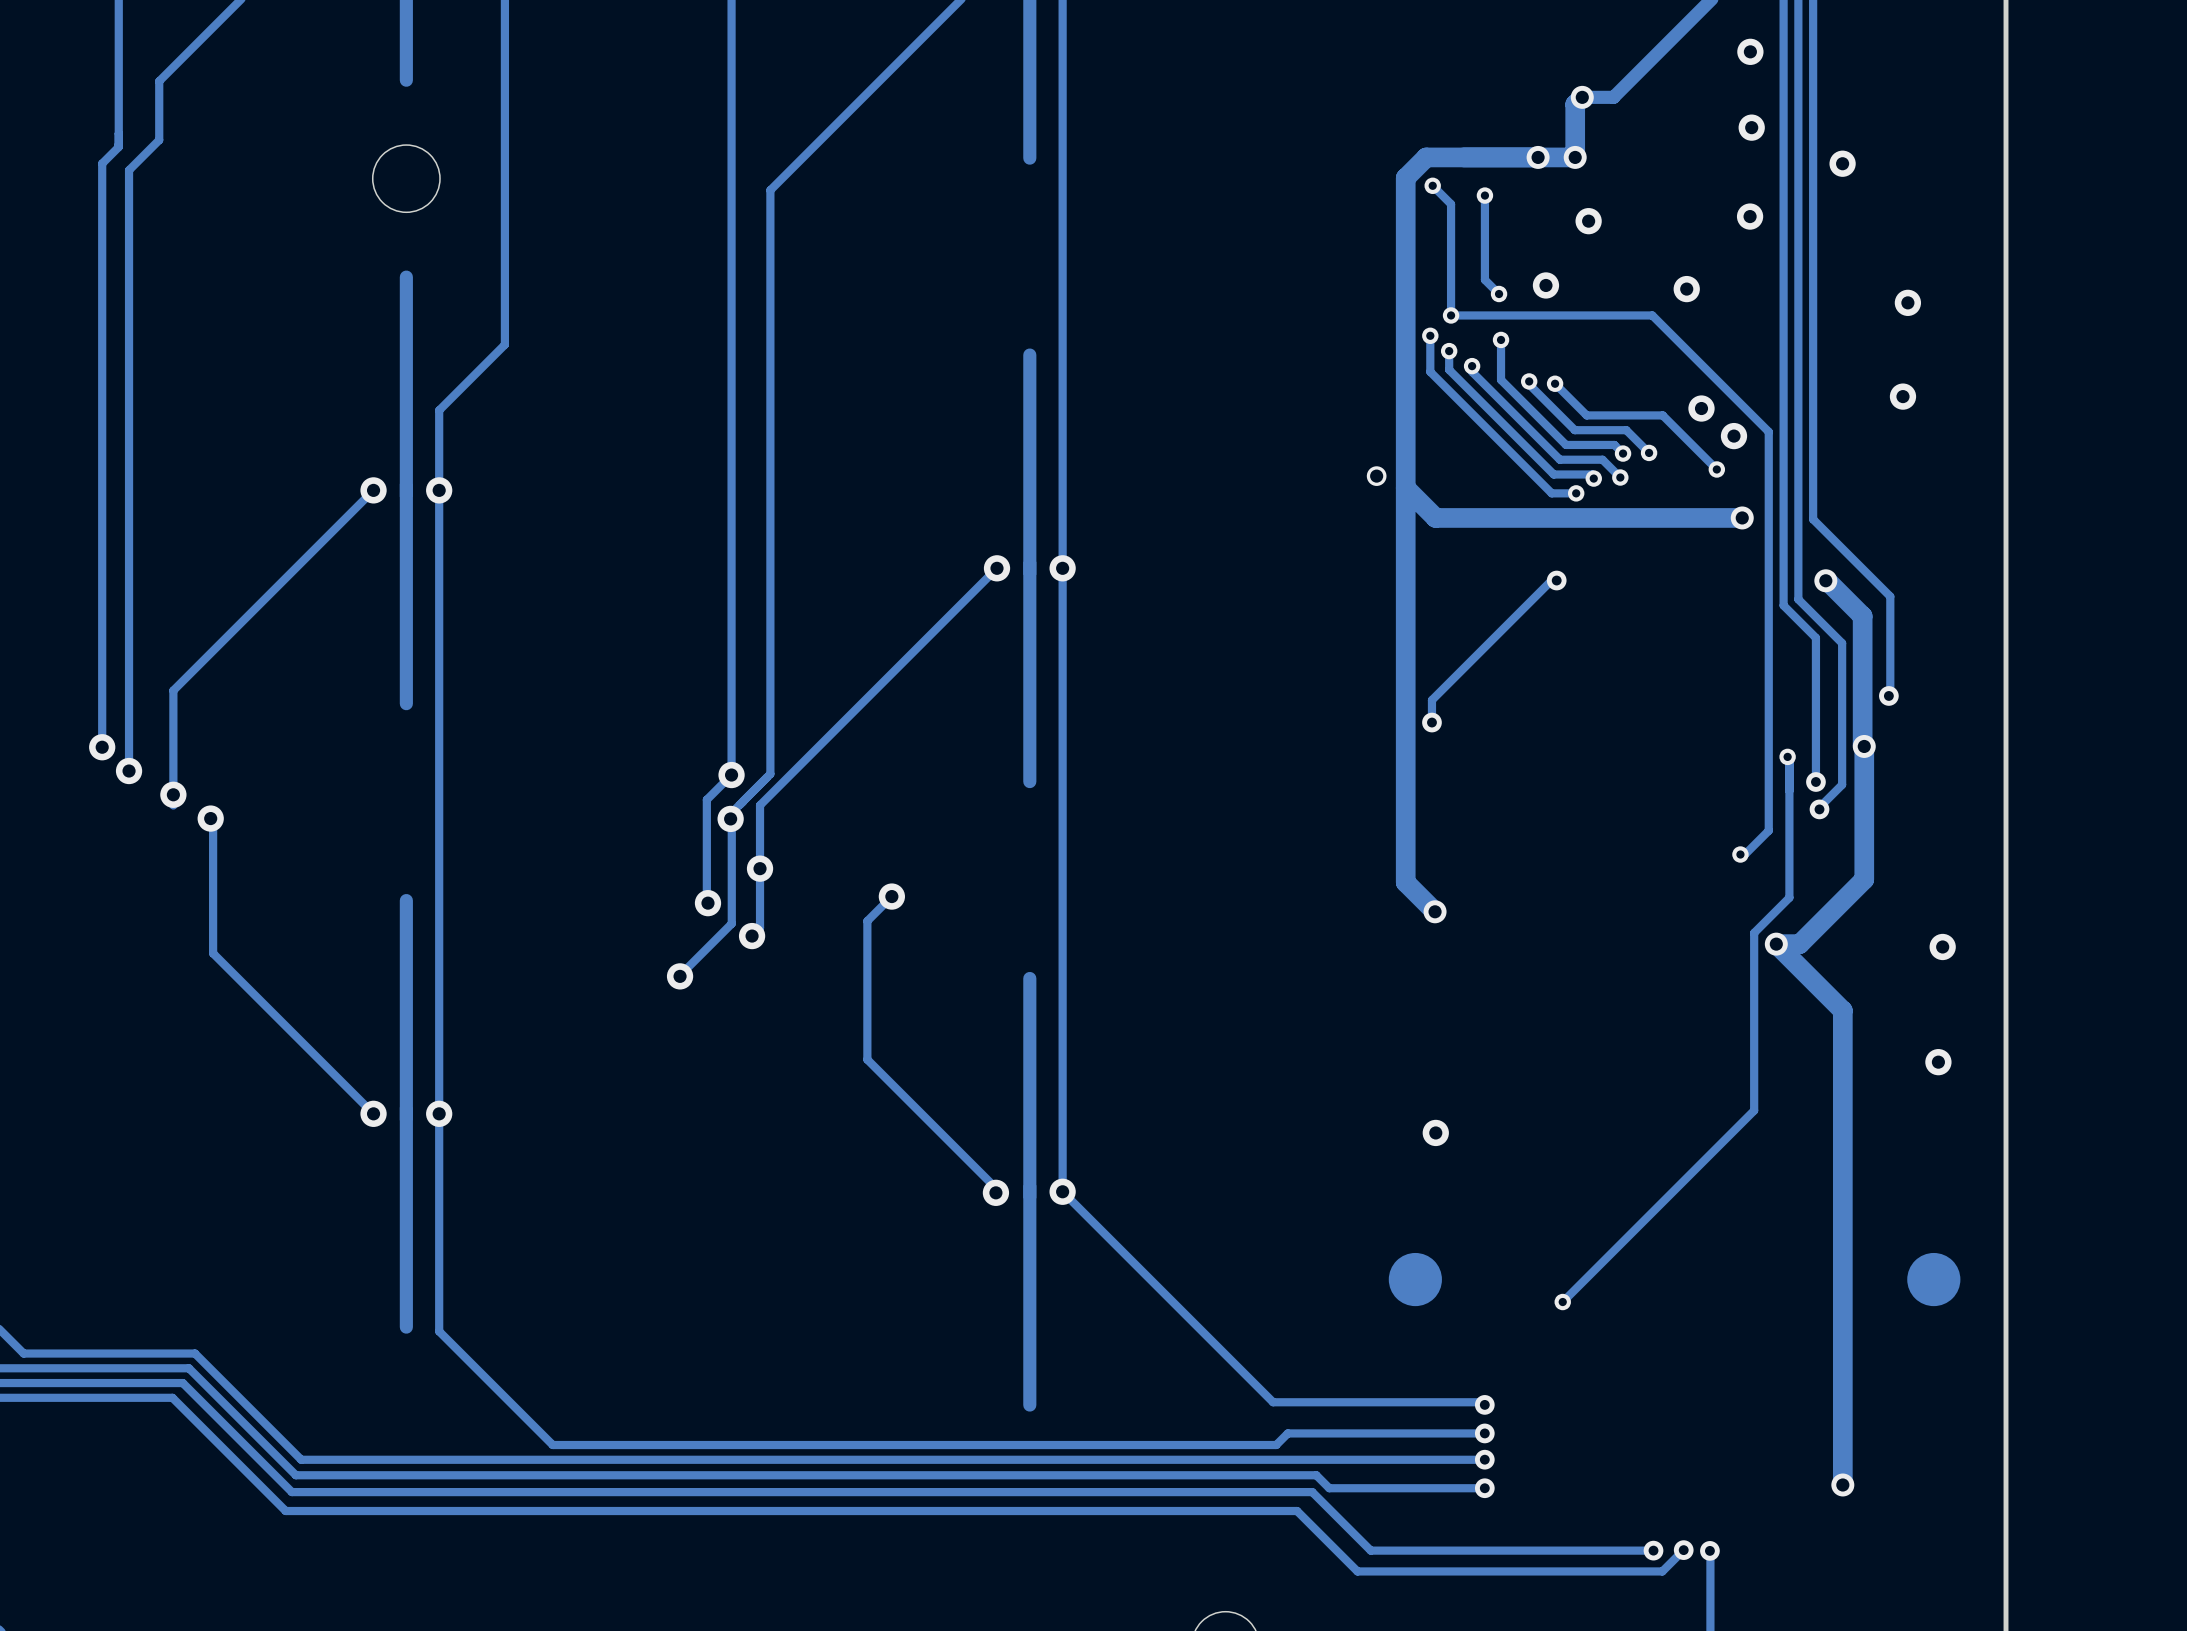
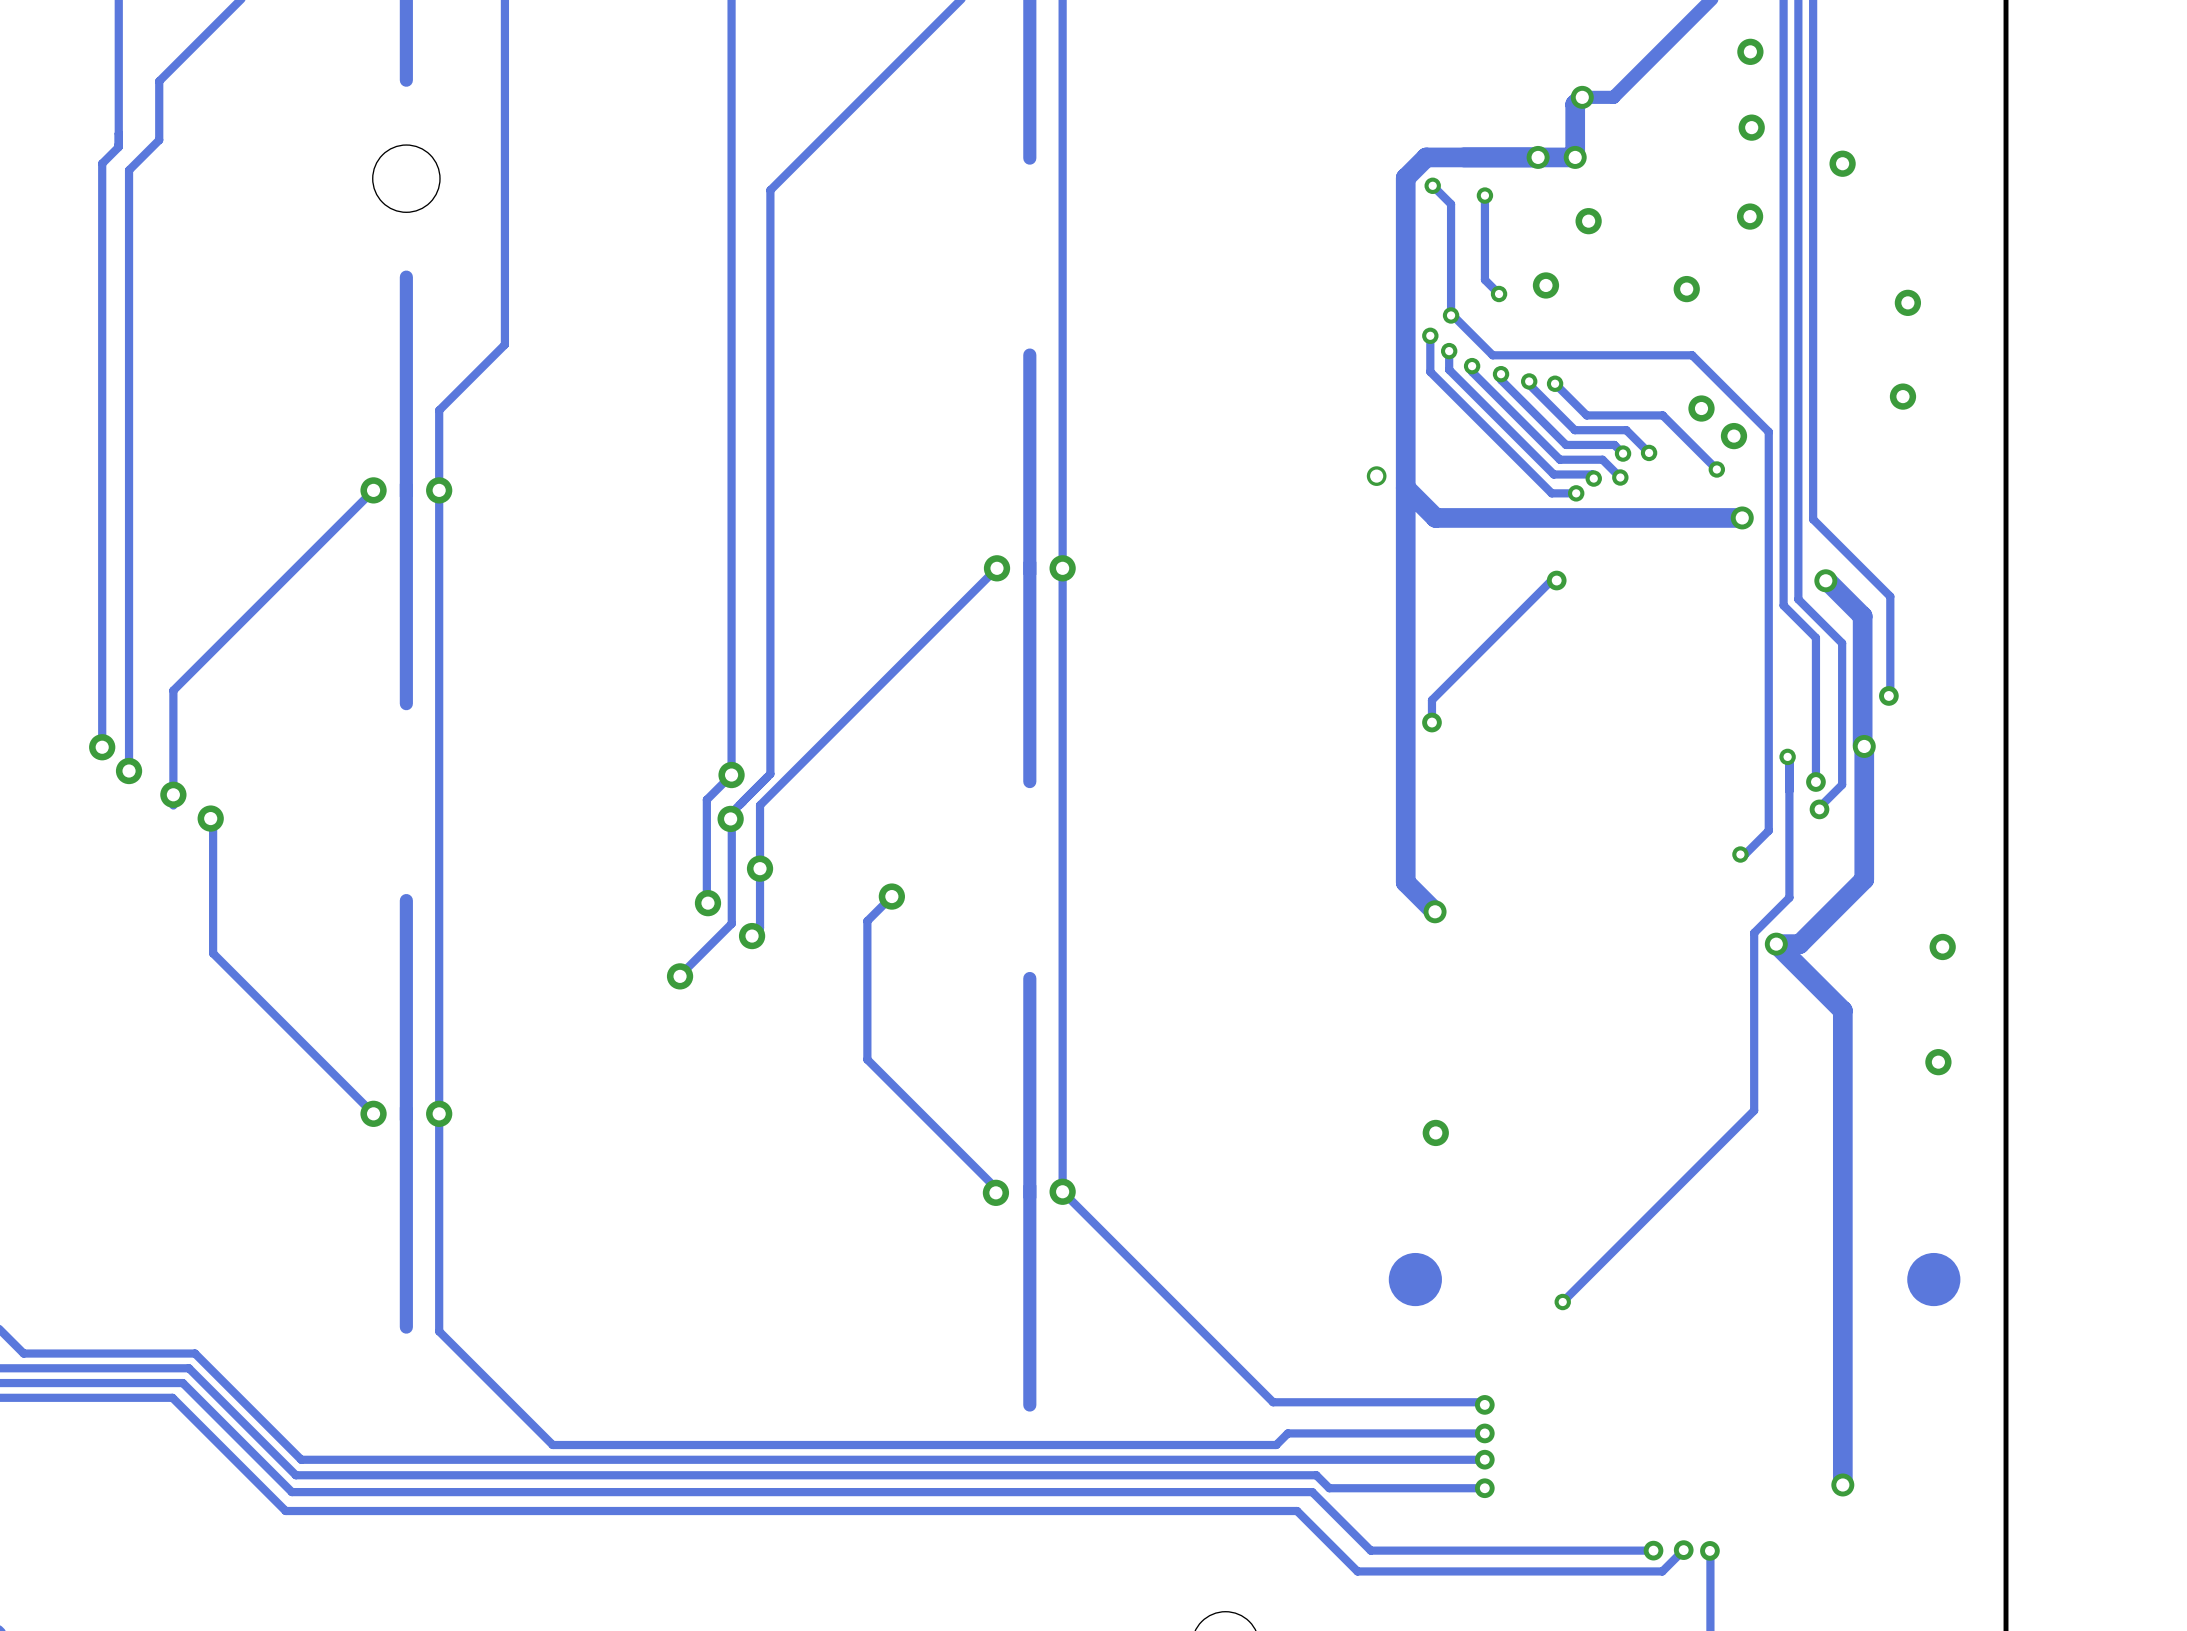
track: (1452, 315) (1652, 315) (1692, 355) -> (1452, 315) (1492, 355) (1692, 355)
track: (1501, 339) (1501, 374) -> none
via position: (1501, 339) -> (1501, 374)

